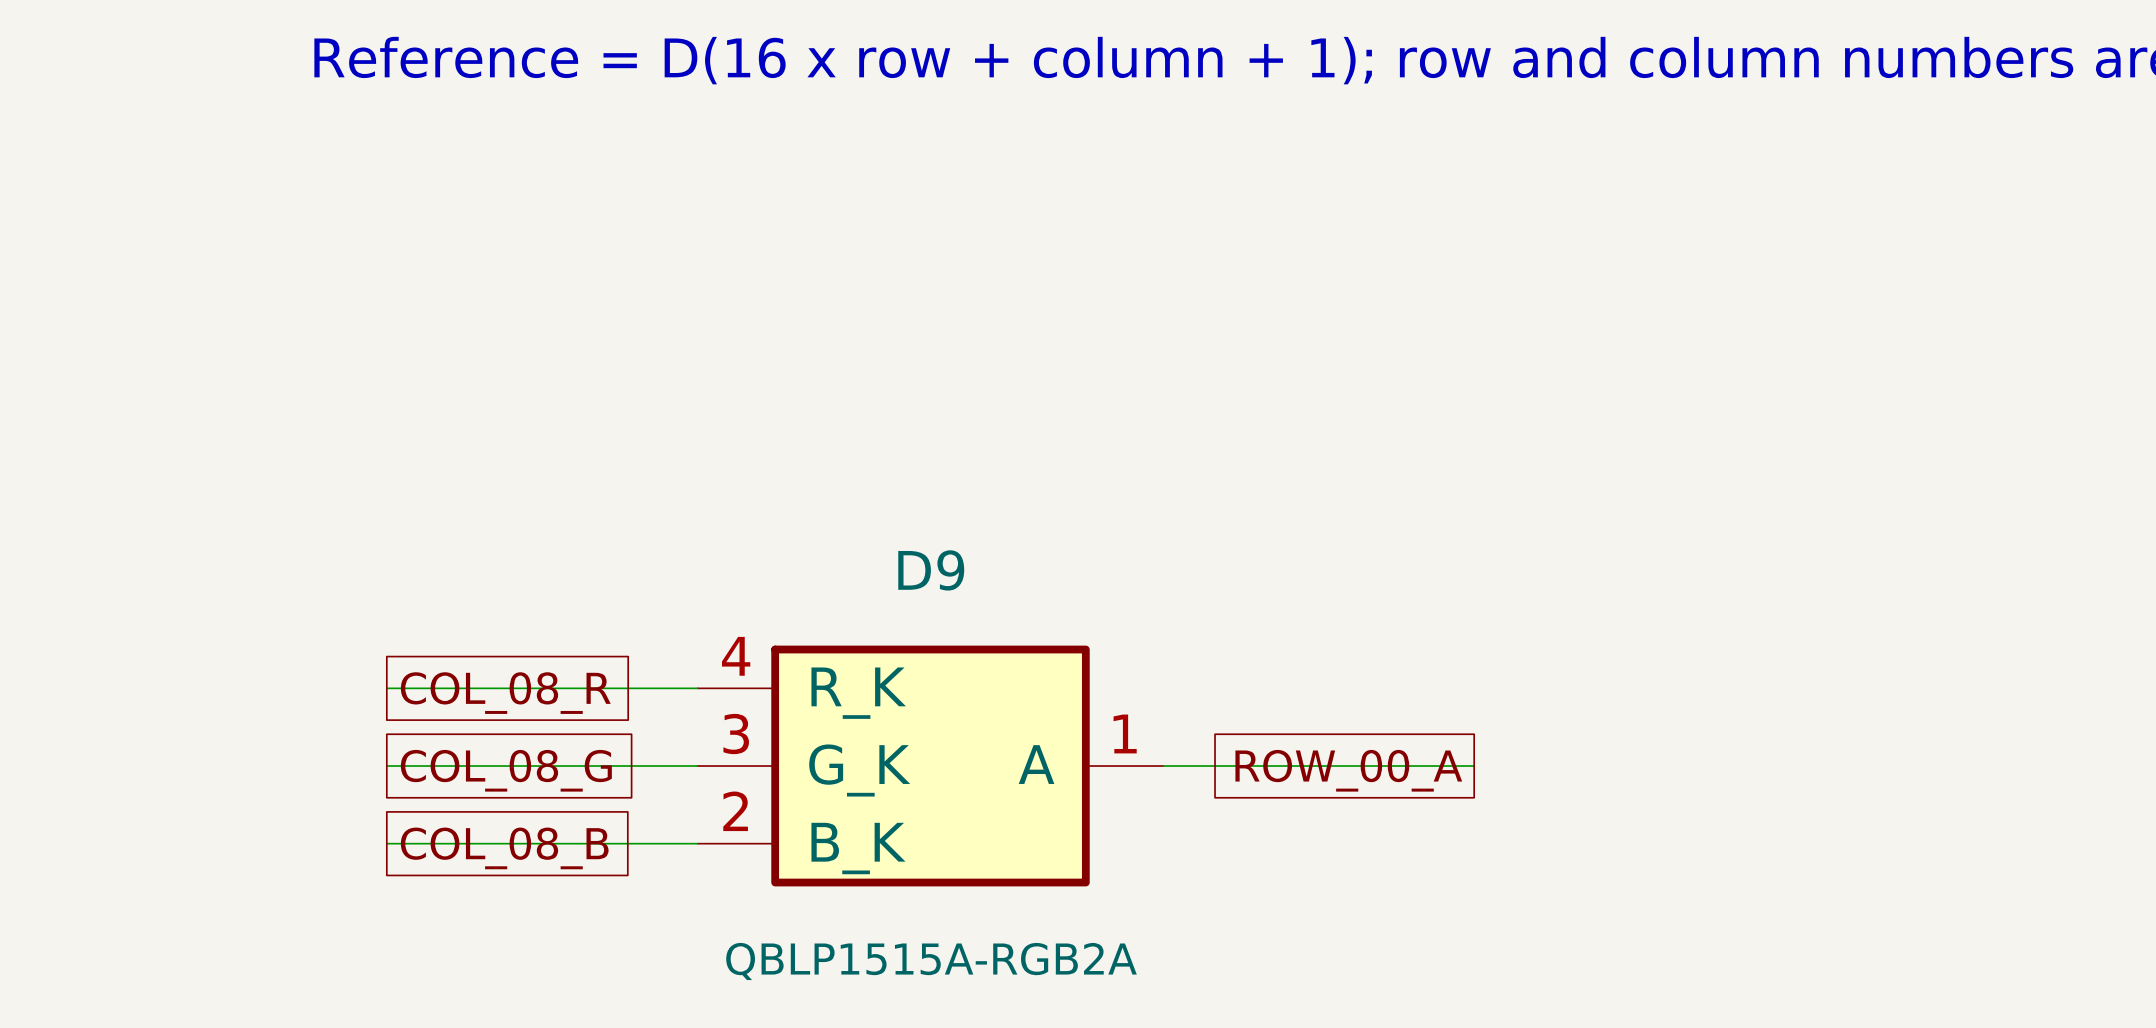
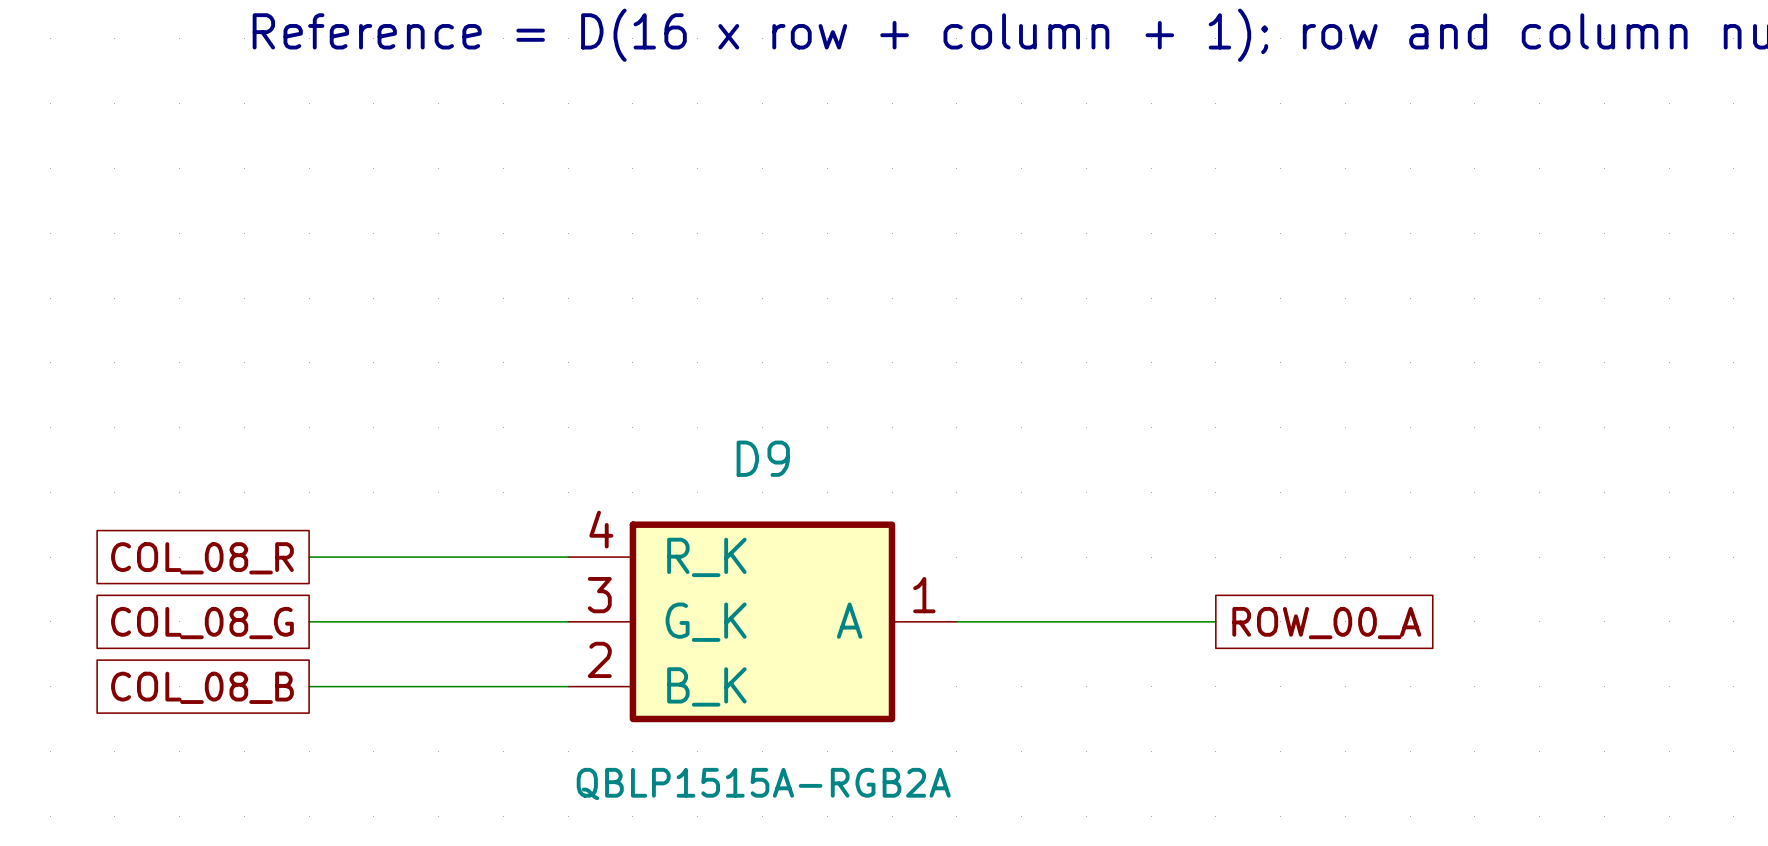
global label rotation: 0° (505, 693) -> 180° (202, 558)
global label rotation: 0° (506, 770) -> 180° (202, 623)
global label rotation: 0° (1348, 770) -> 180° (1326, 623)
global label position: ROW_00_A (1348, 770) -> ROW_00_A (1326, 623)
global label rotation: 0° (504, 848) -> 180° (202, 687)

